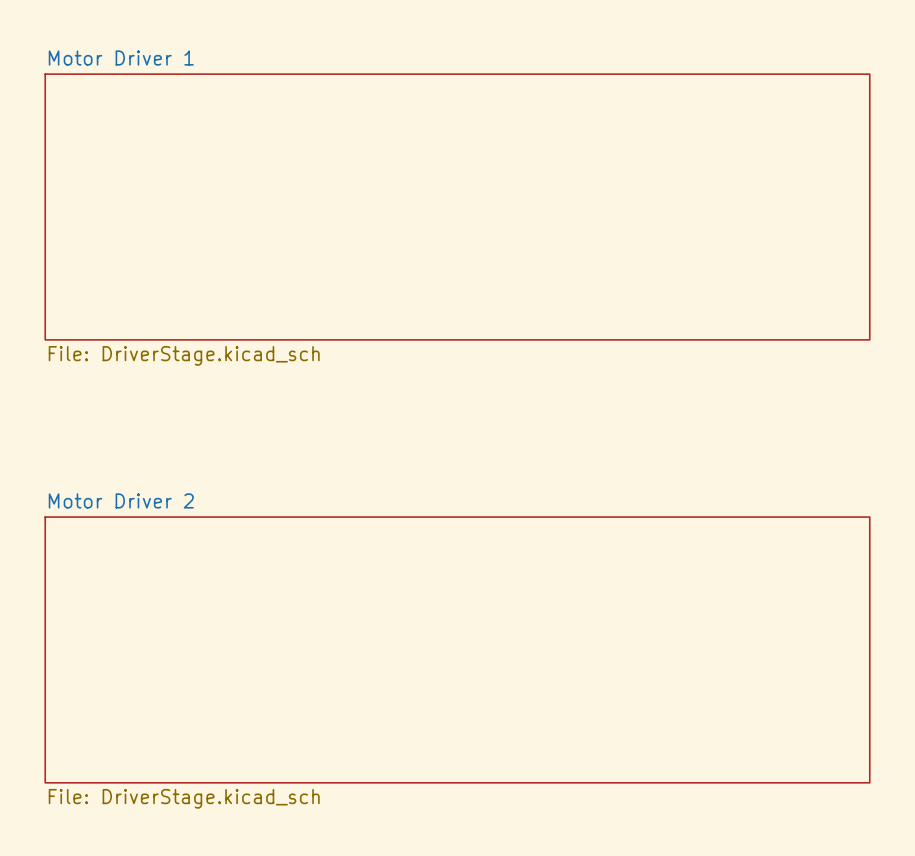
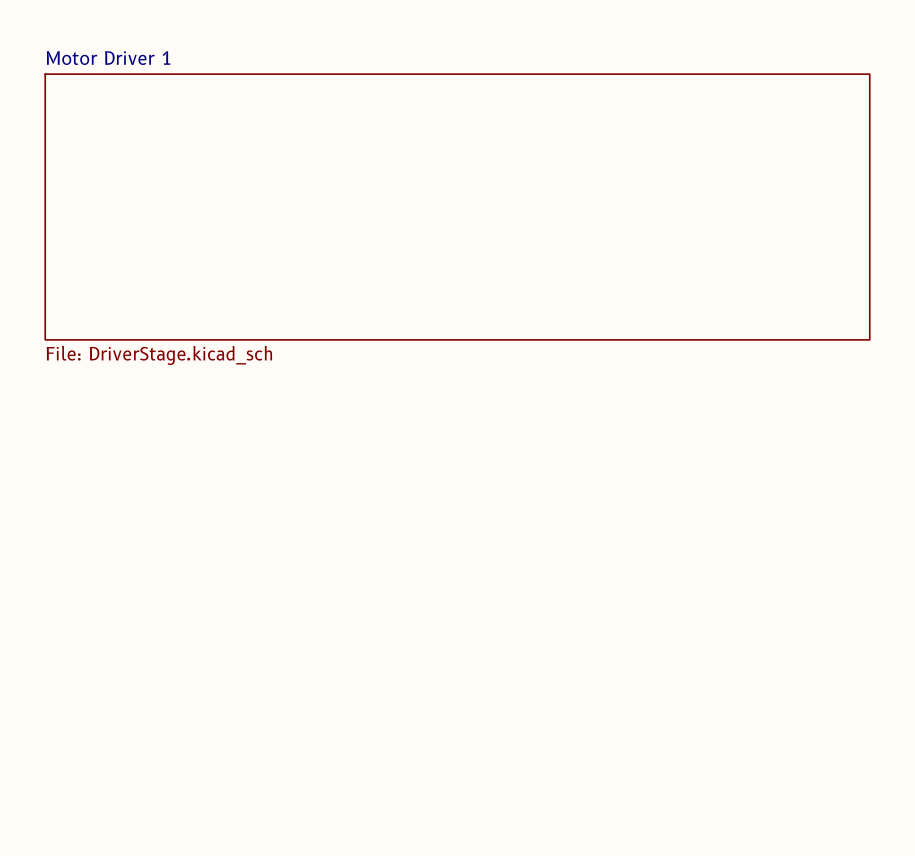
sheet Motor Driver 2: File: DriverStage.kicad_sch (457, 649) -> none

